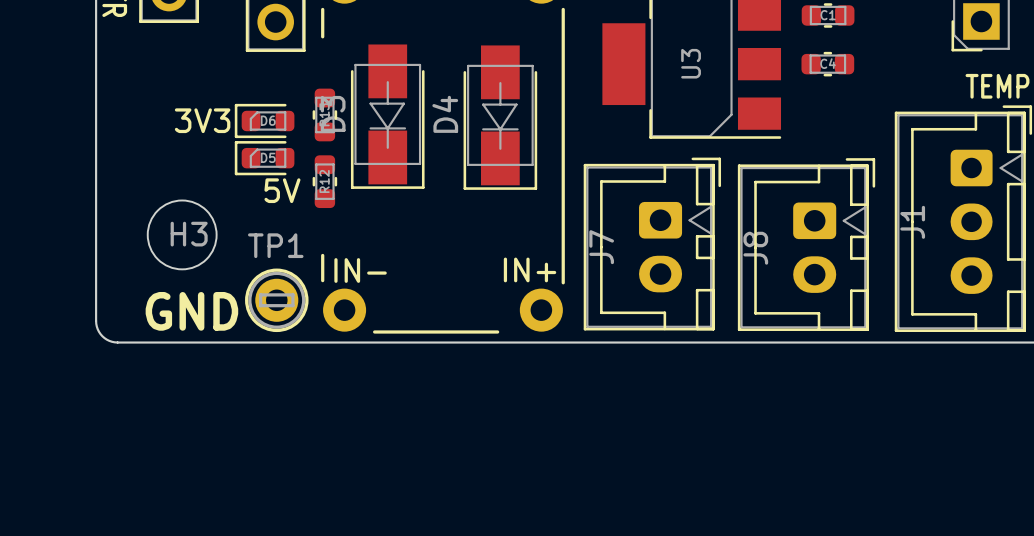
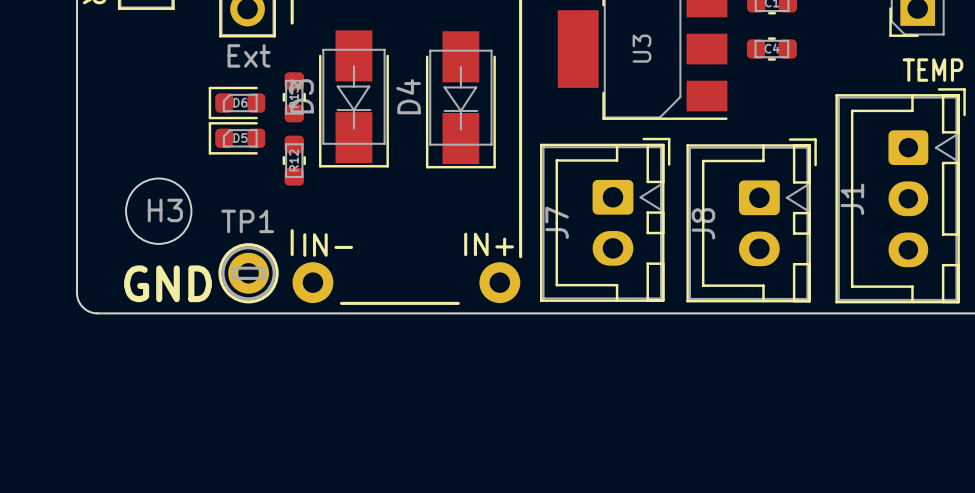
part value: none -> Ext (249, 55)
text: 3V3 (202, 120) -> none
text: 5V (282, 190) -> none

